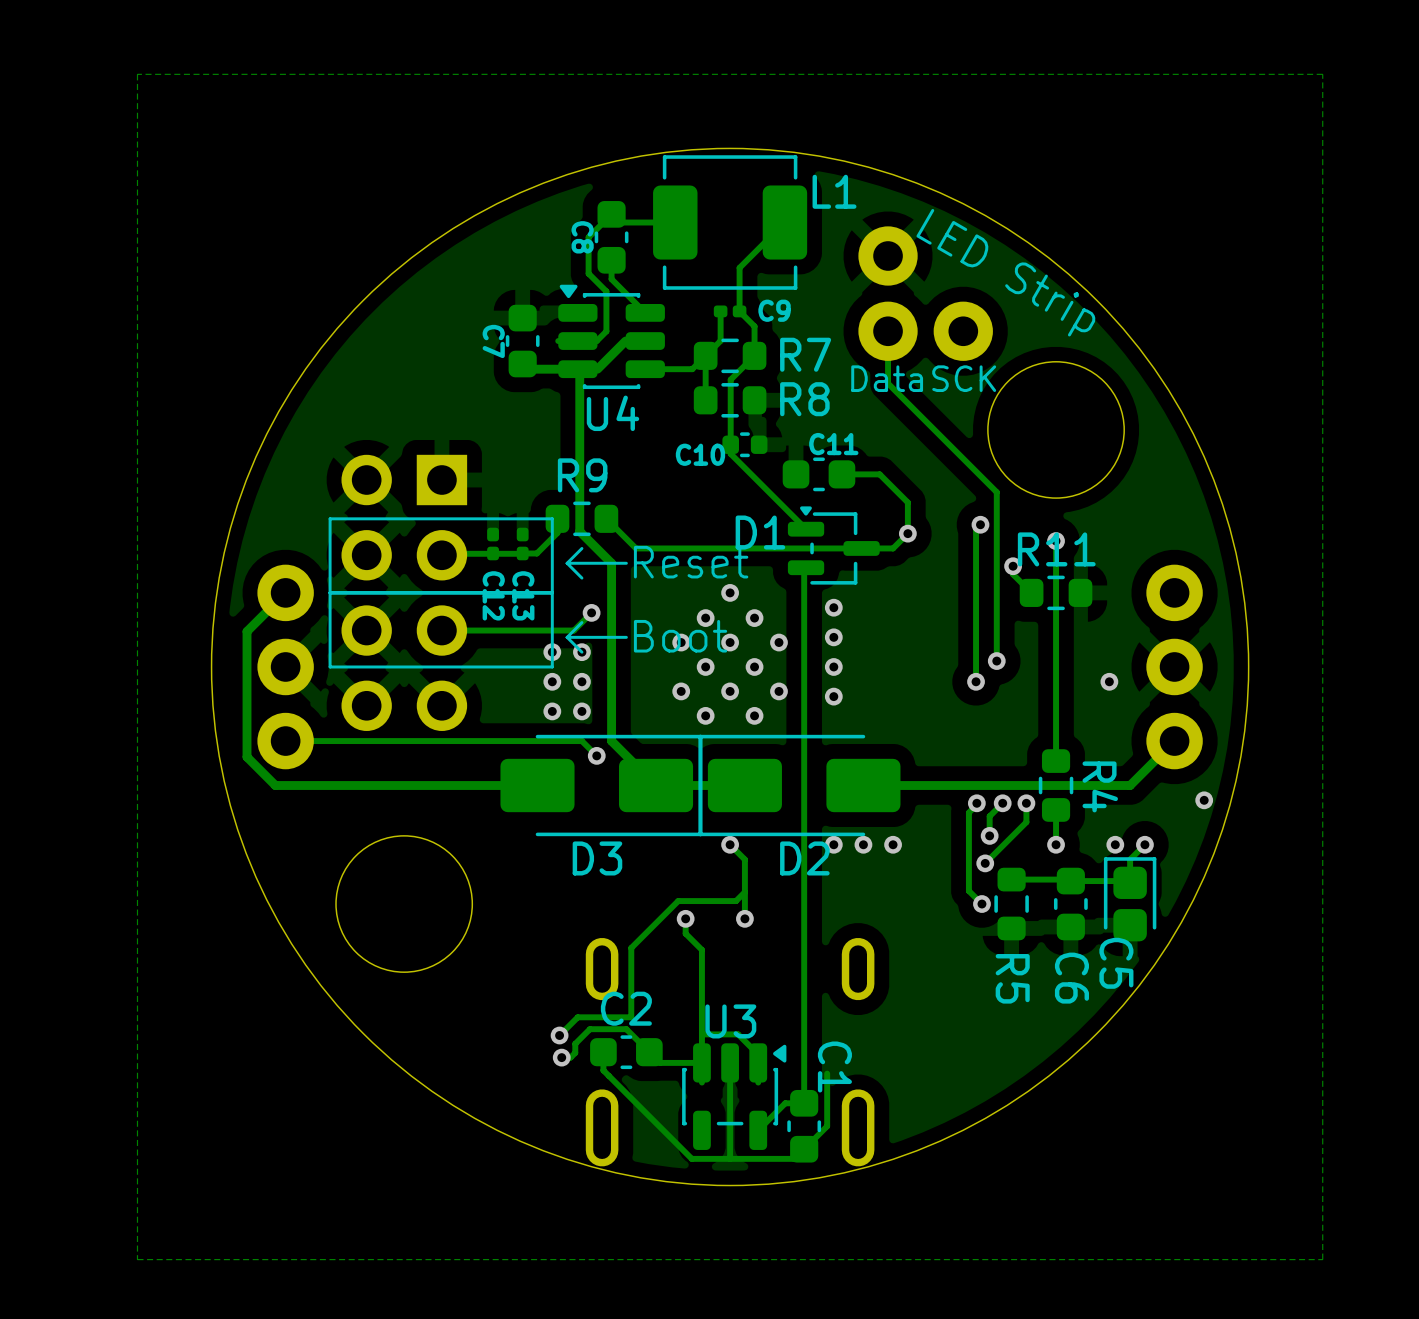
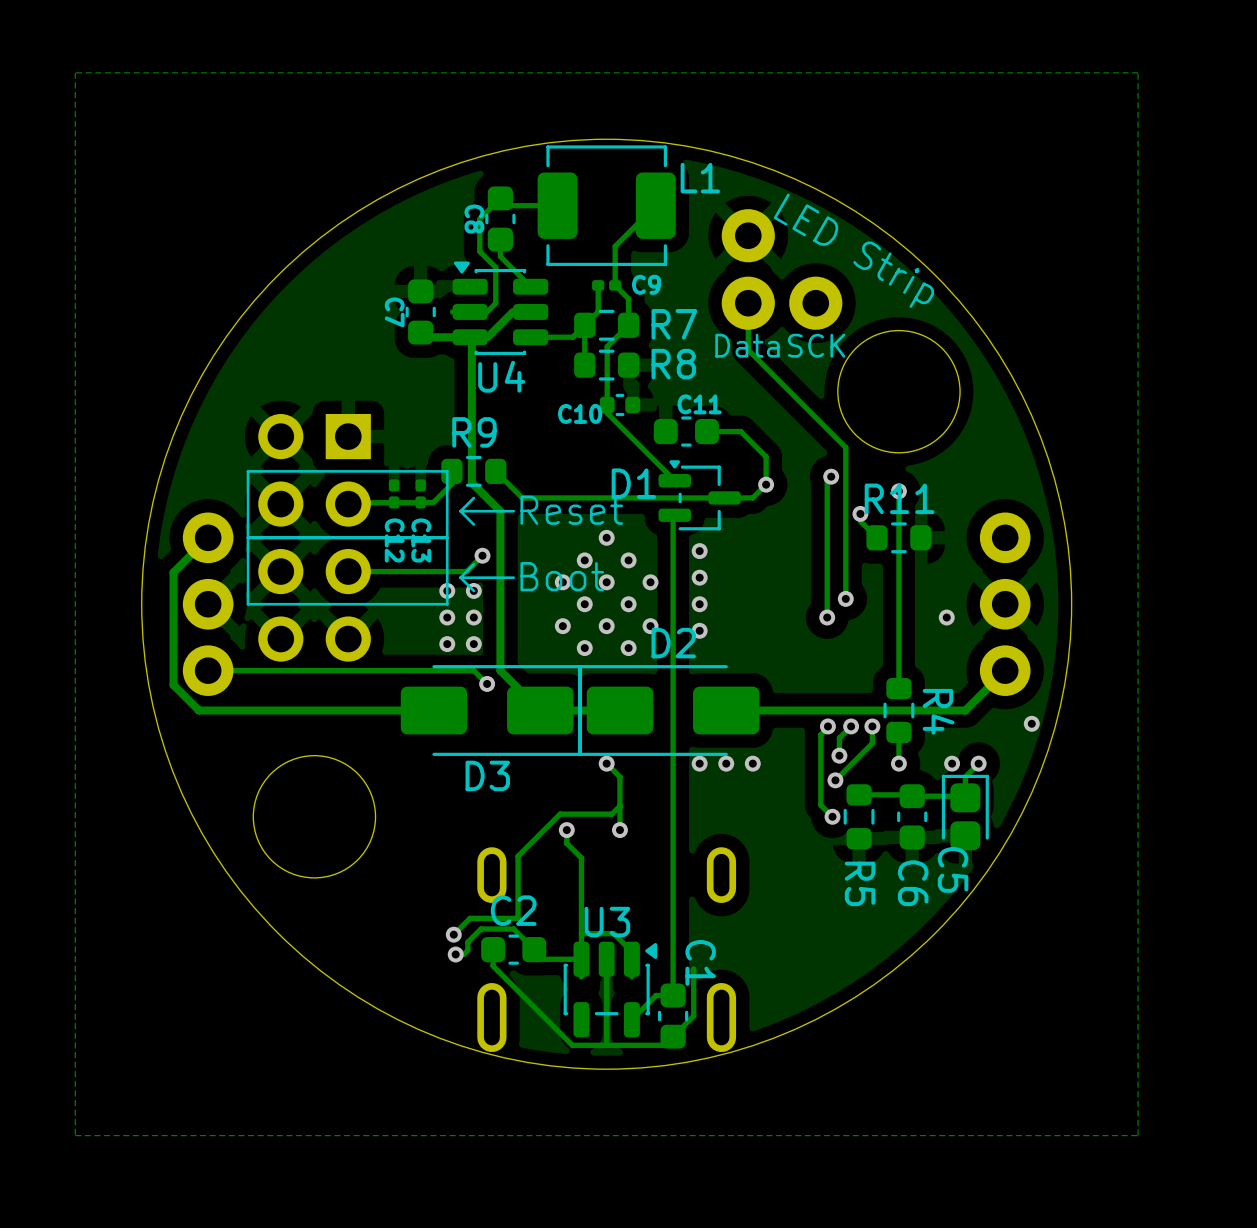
D2 name position: D2 (804, 858) -> D2 (673, 643)

